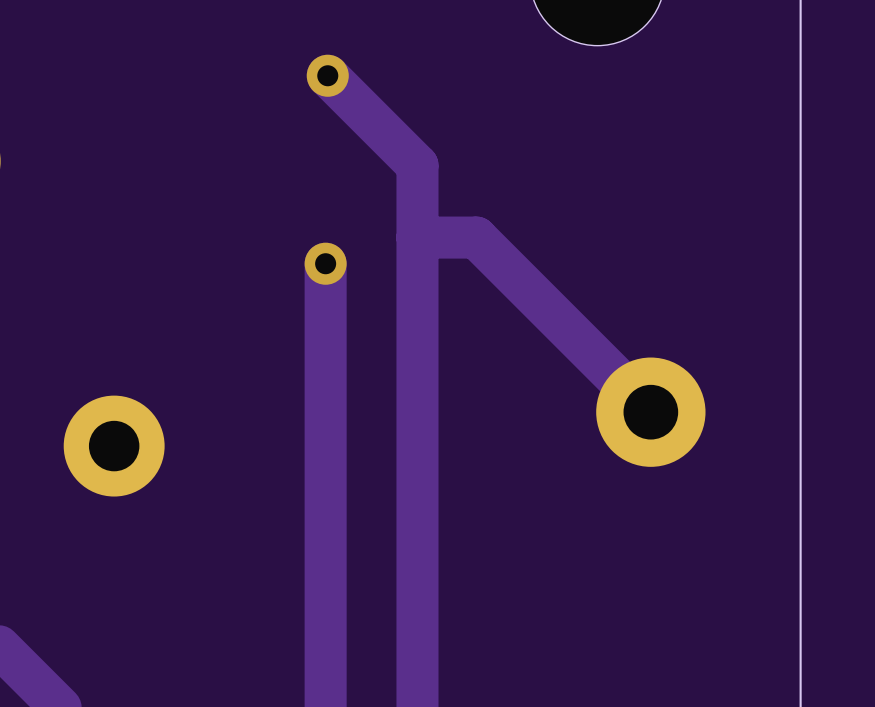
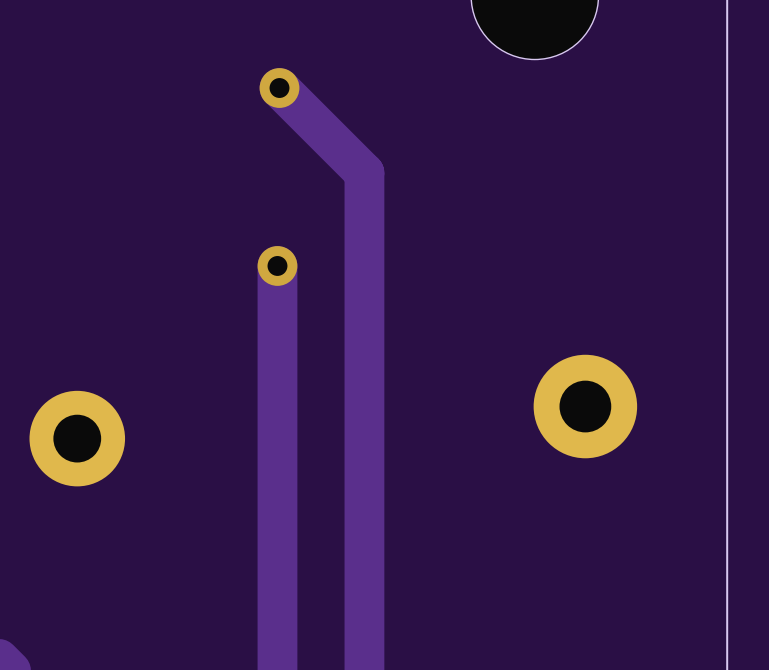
track: (417, 237) (476, 237) (650, 412) -> none

